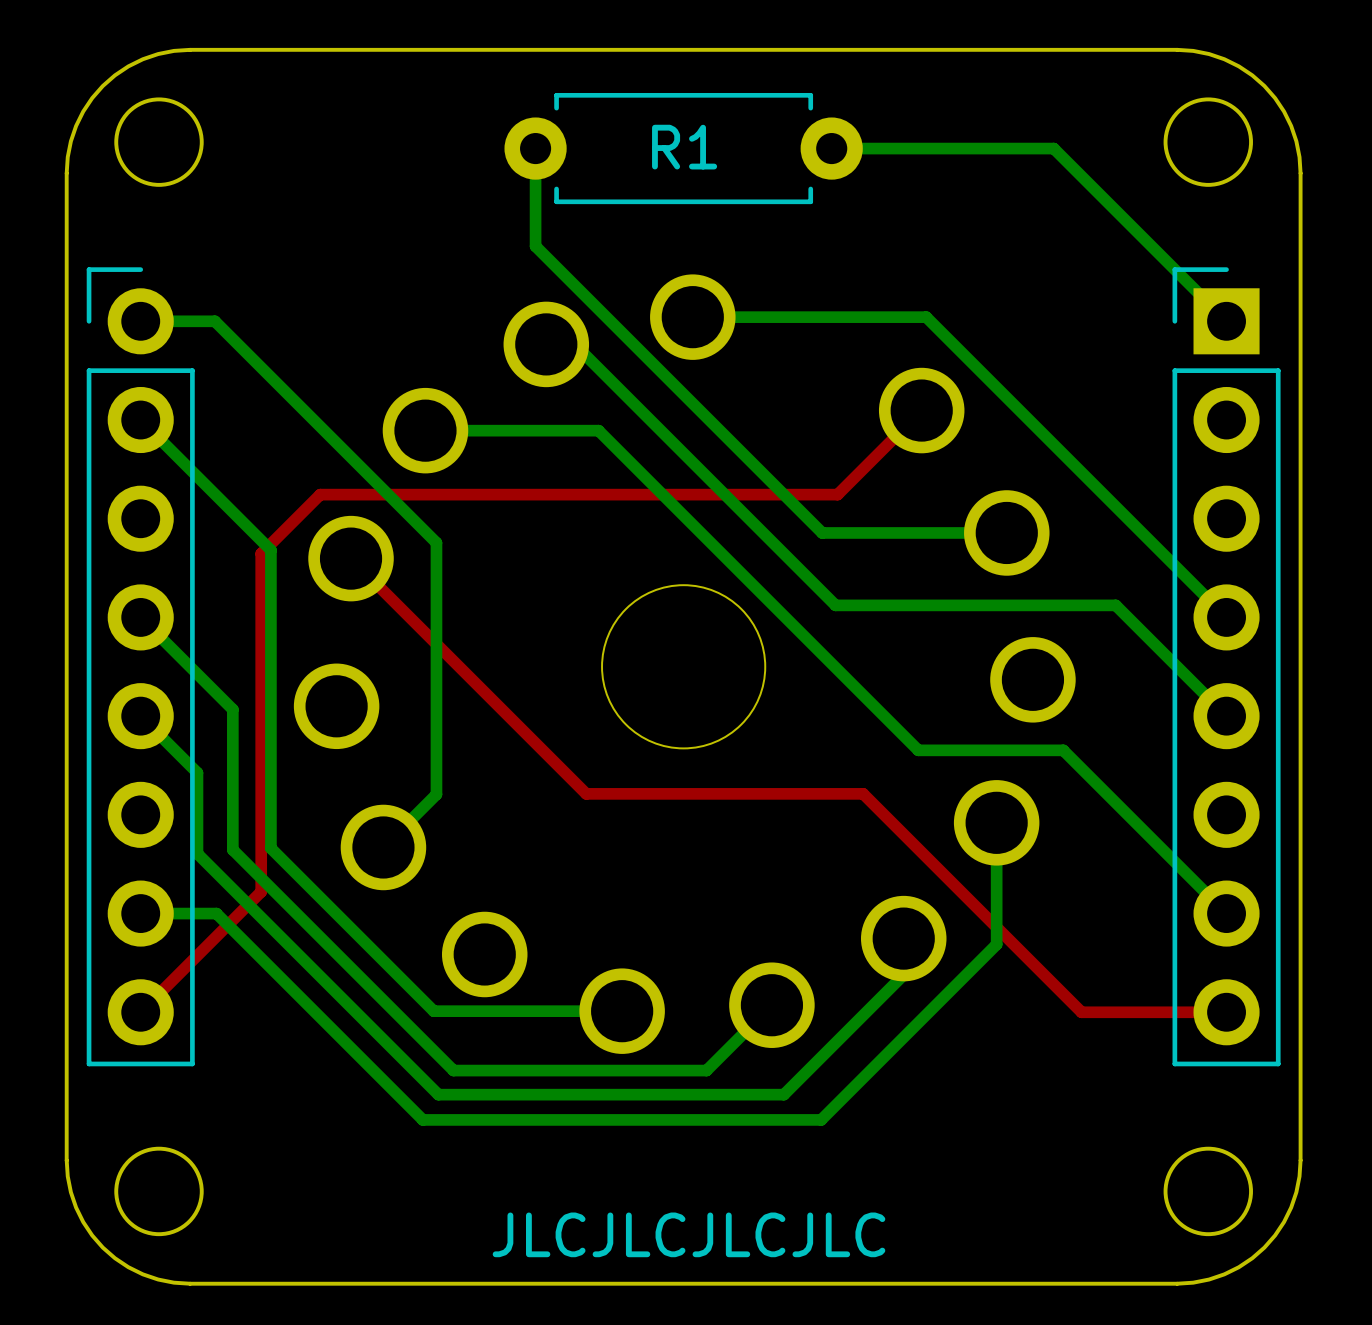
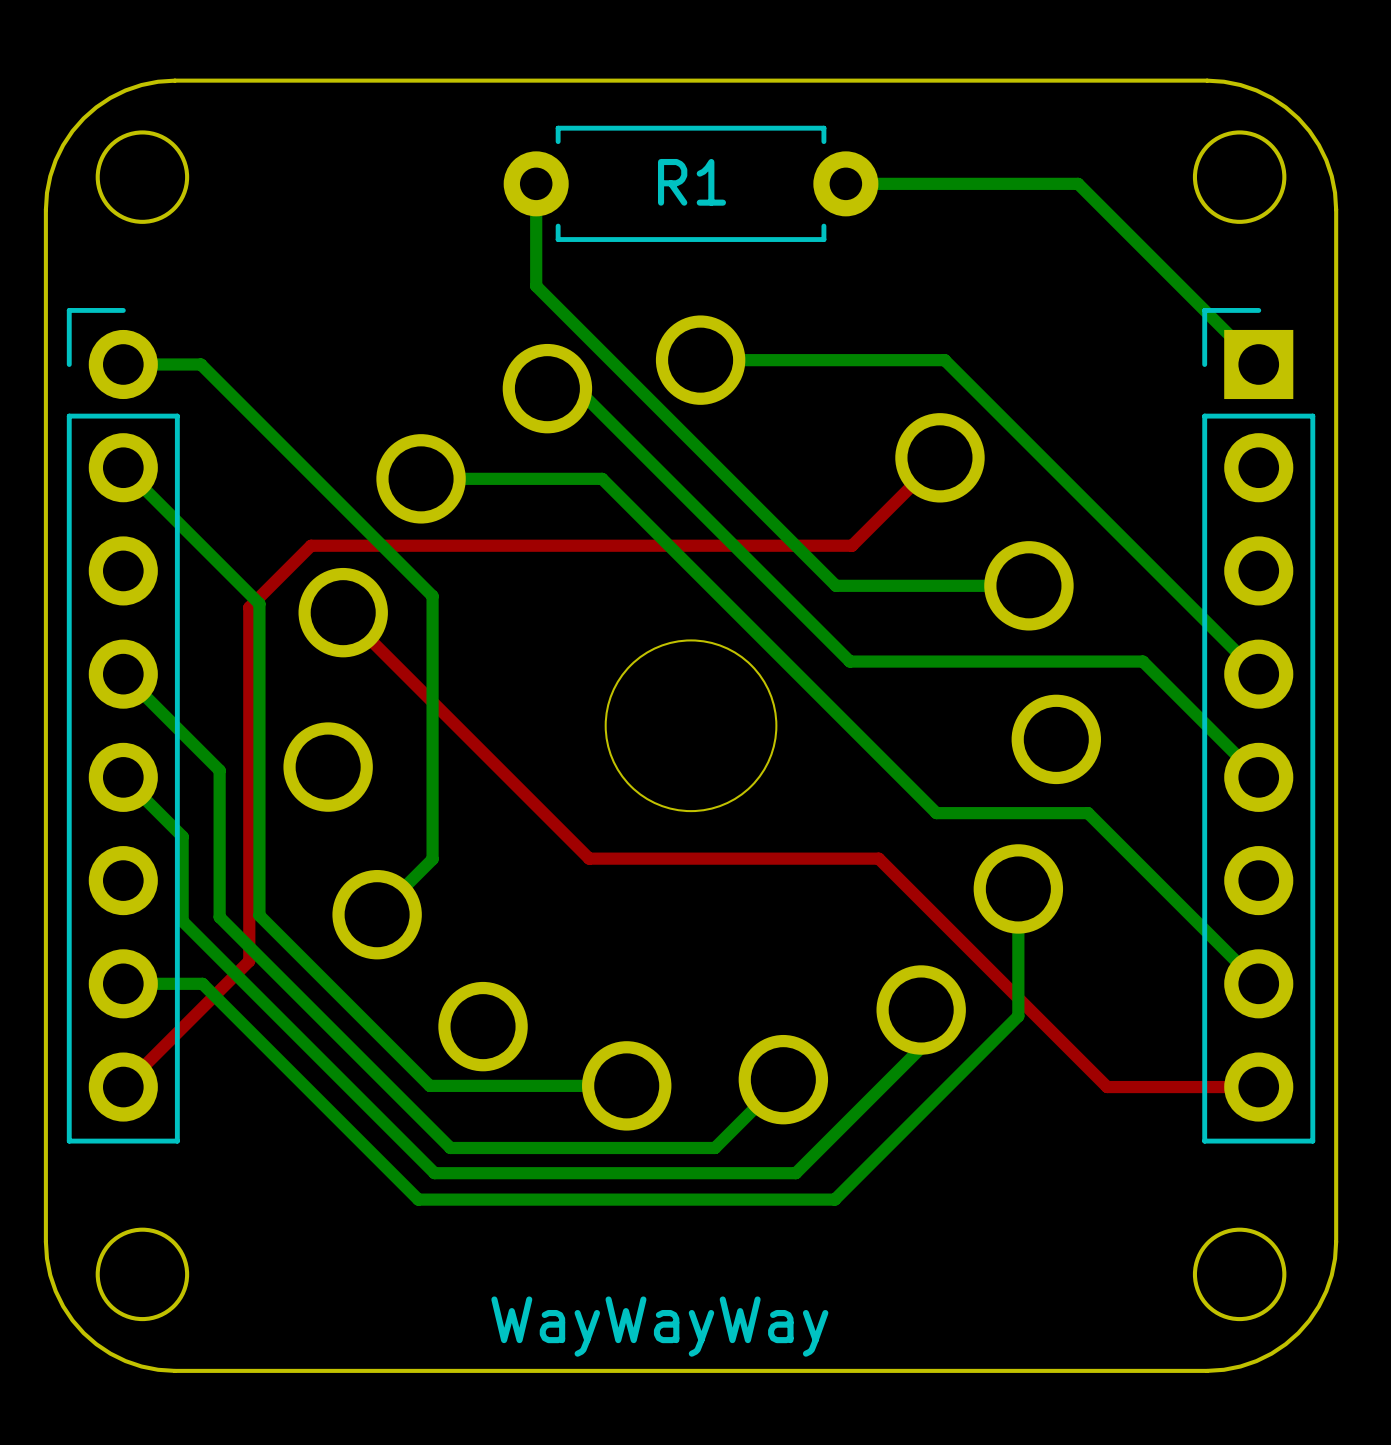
text: JLCJLCJLCJLC (688, 1234) -> WayWayWay (659, 1326)

